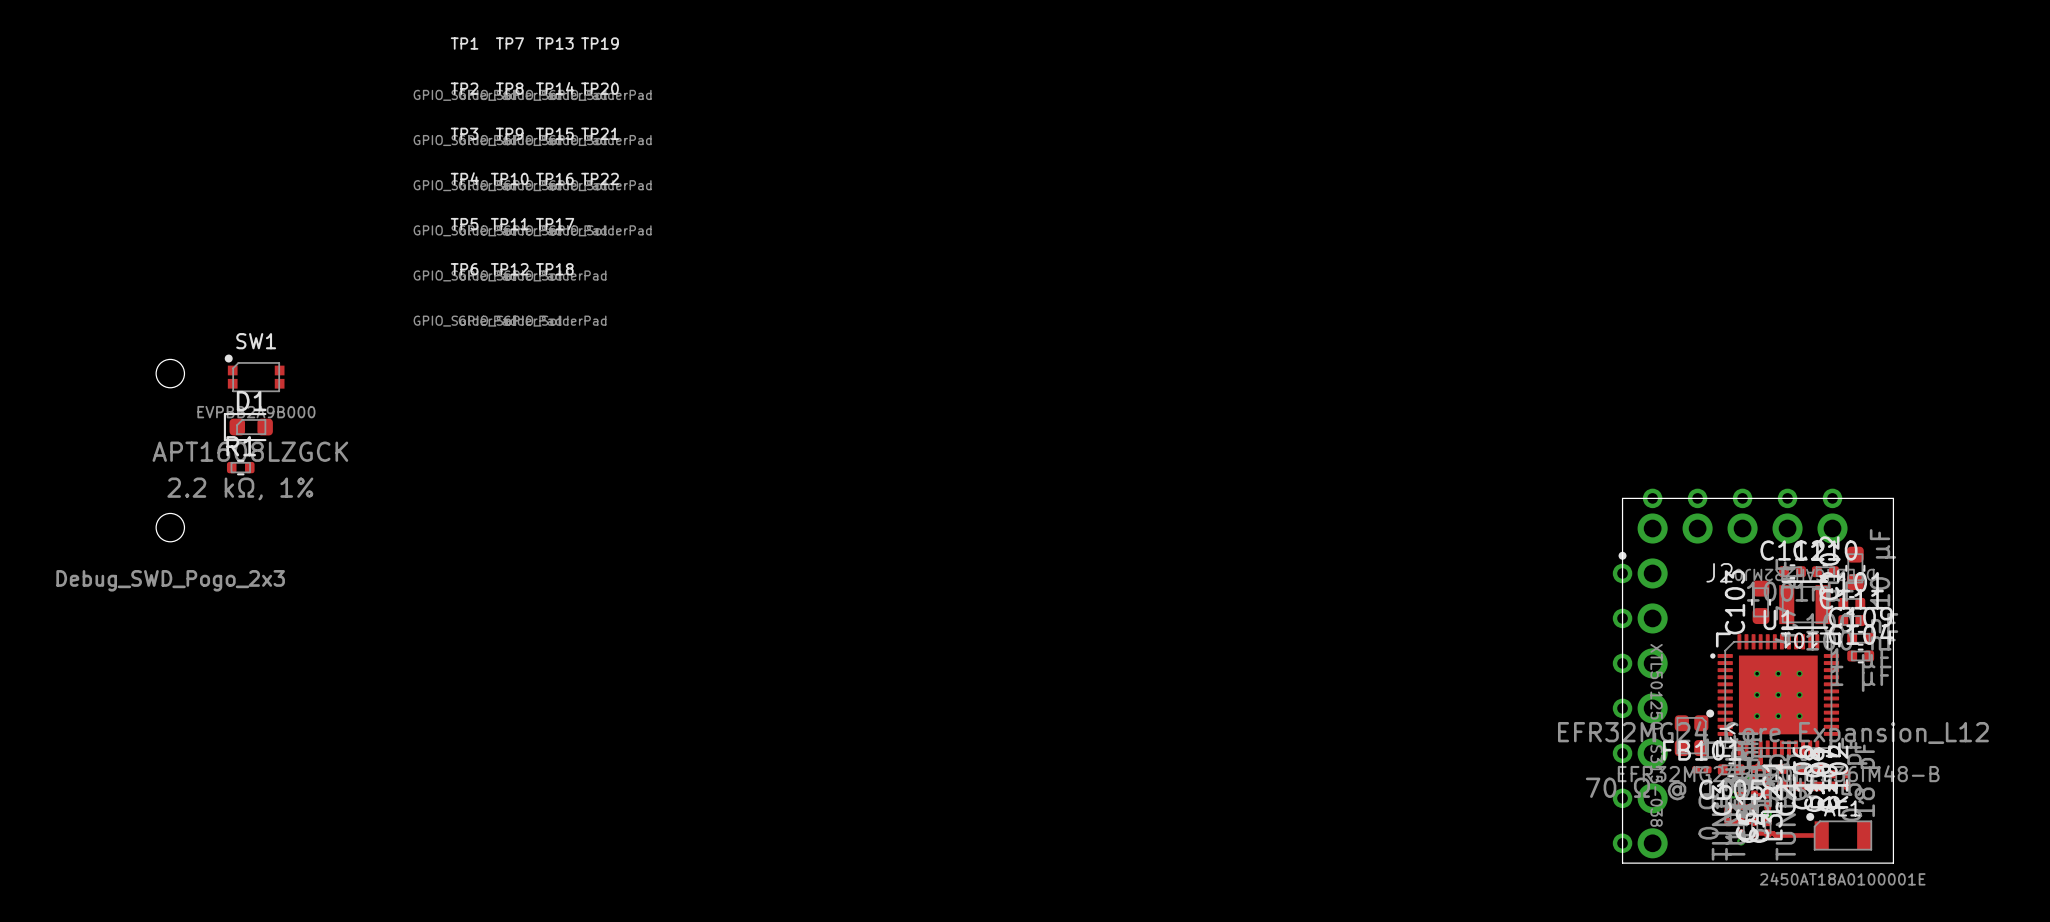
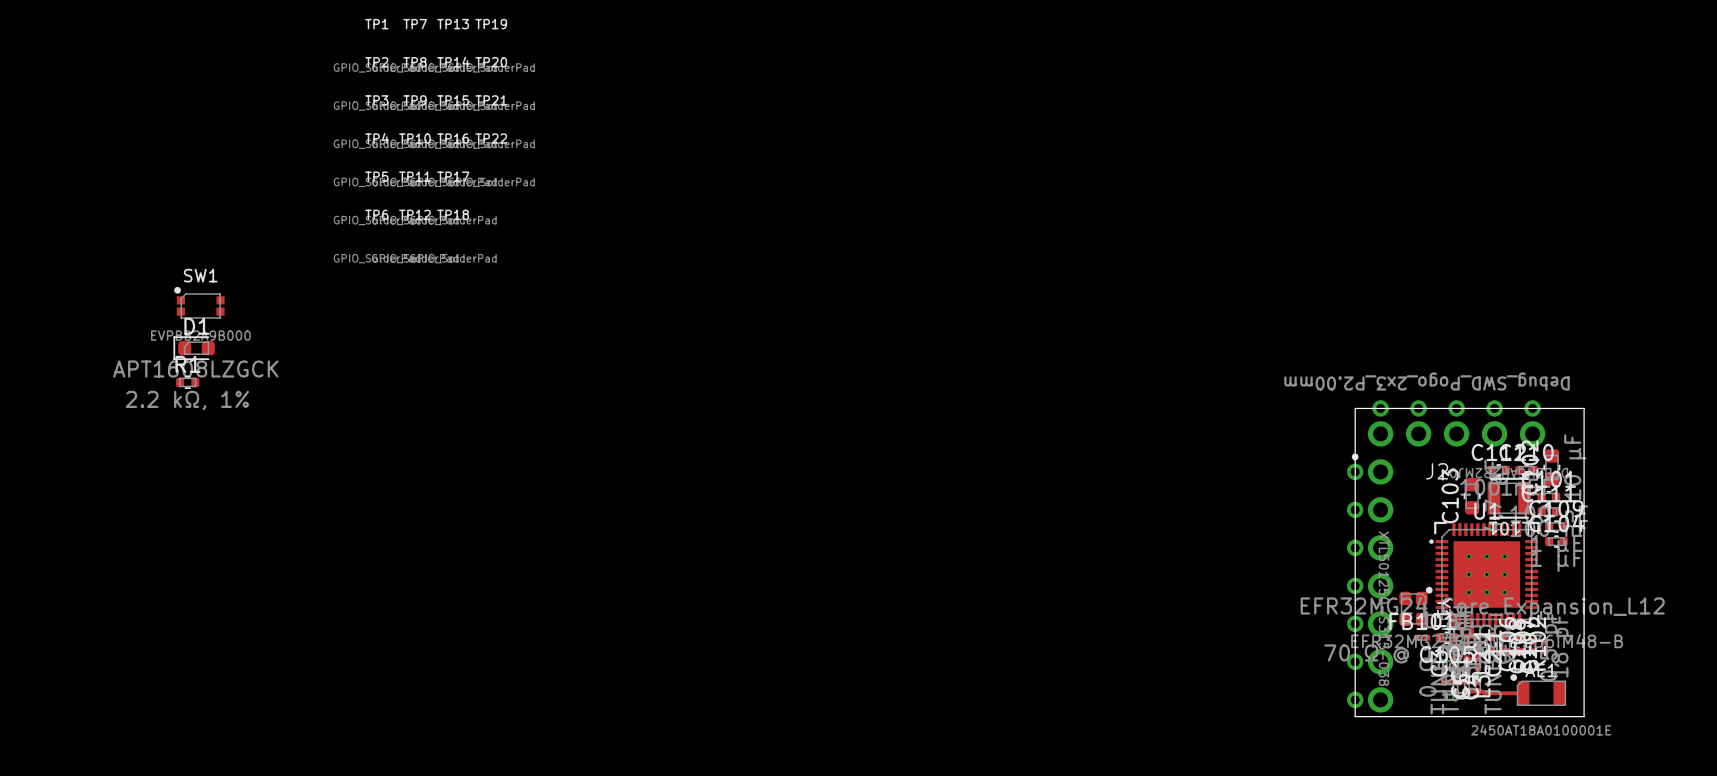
part: Debug_SWD_Pogo_2x3 (170, 450) -> none
part: none -> Debug_SWD_Pogo_2x3_P2.00mm (1427, 381)

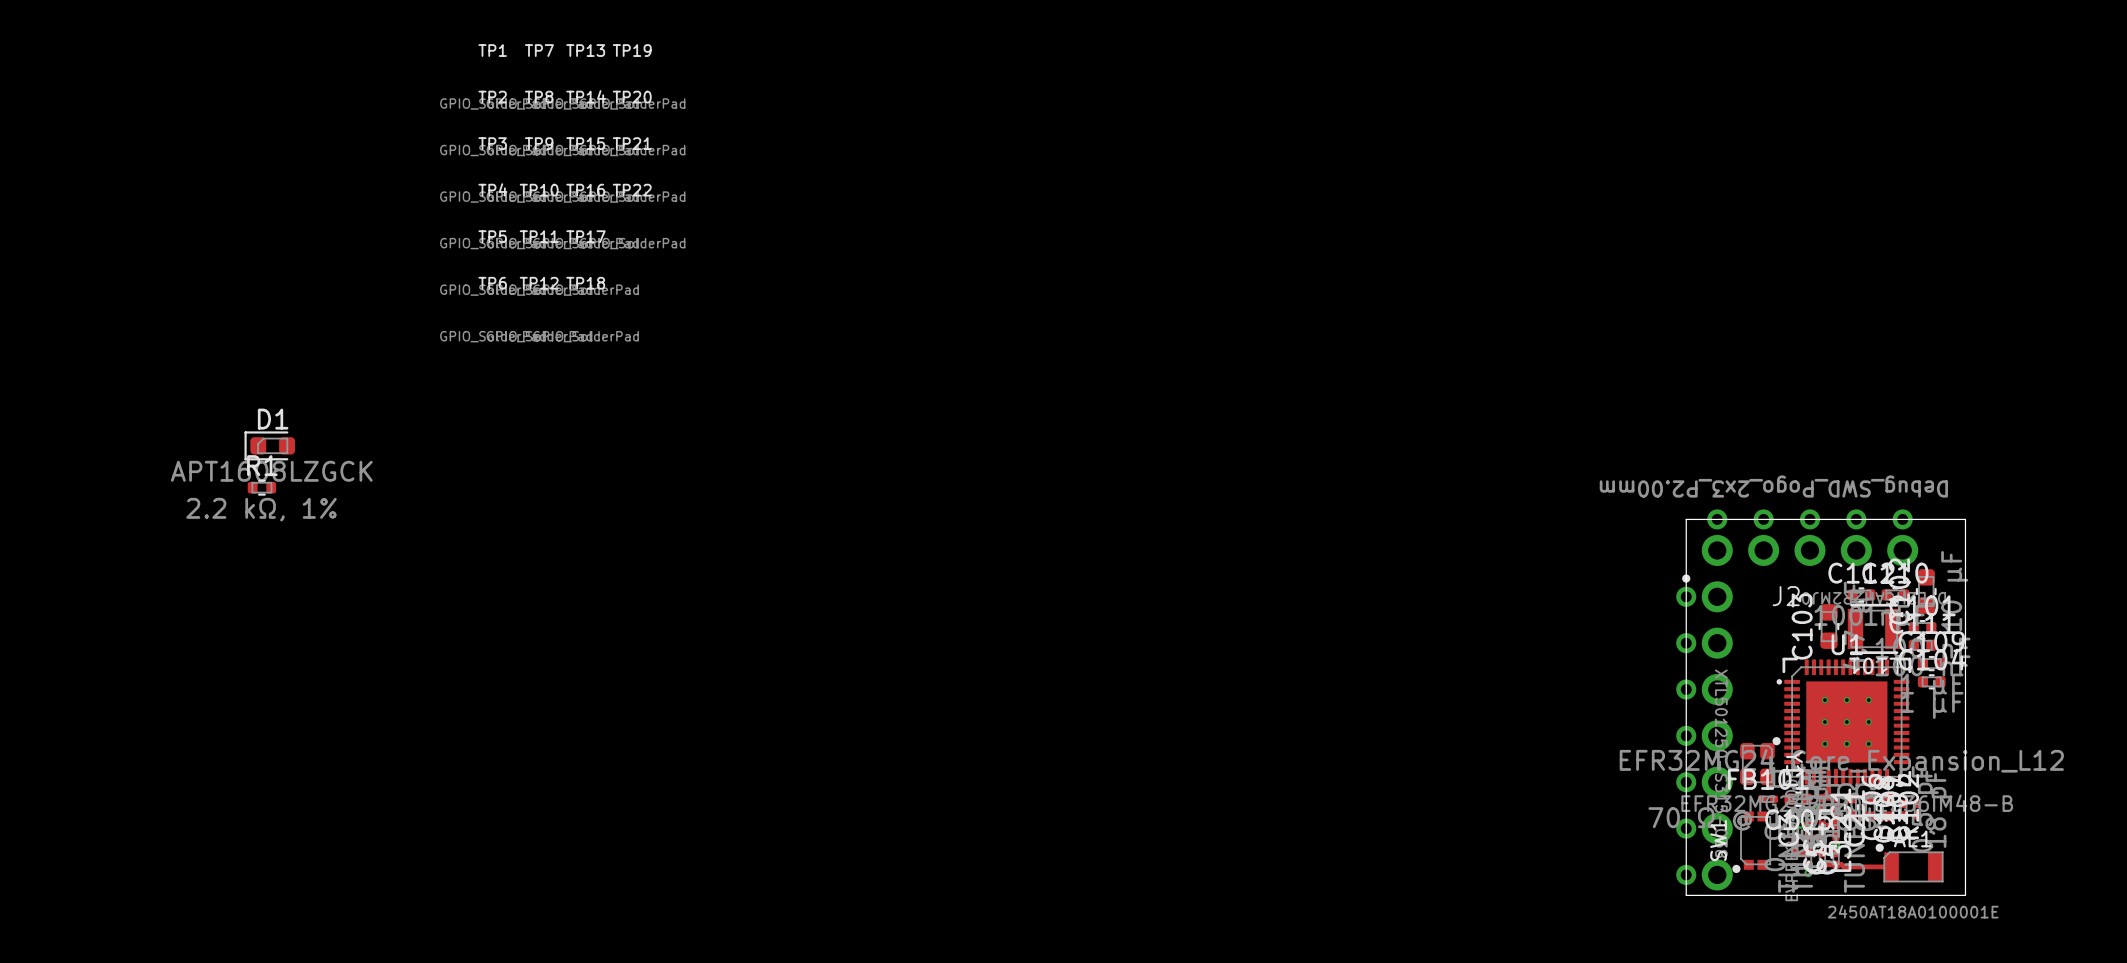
SW1 rotation: 0° (199, 302) -> 90° counterclockwise (1751, 842)
SW1 position: (199, 302) -> (1751, 842)

